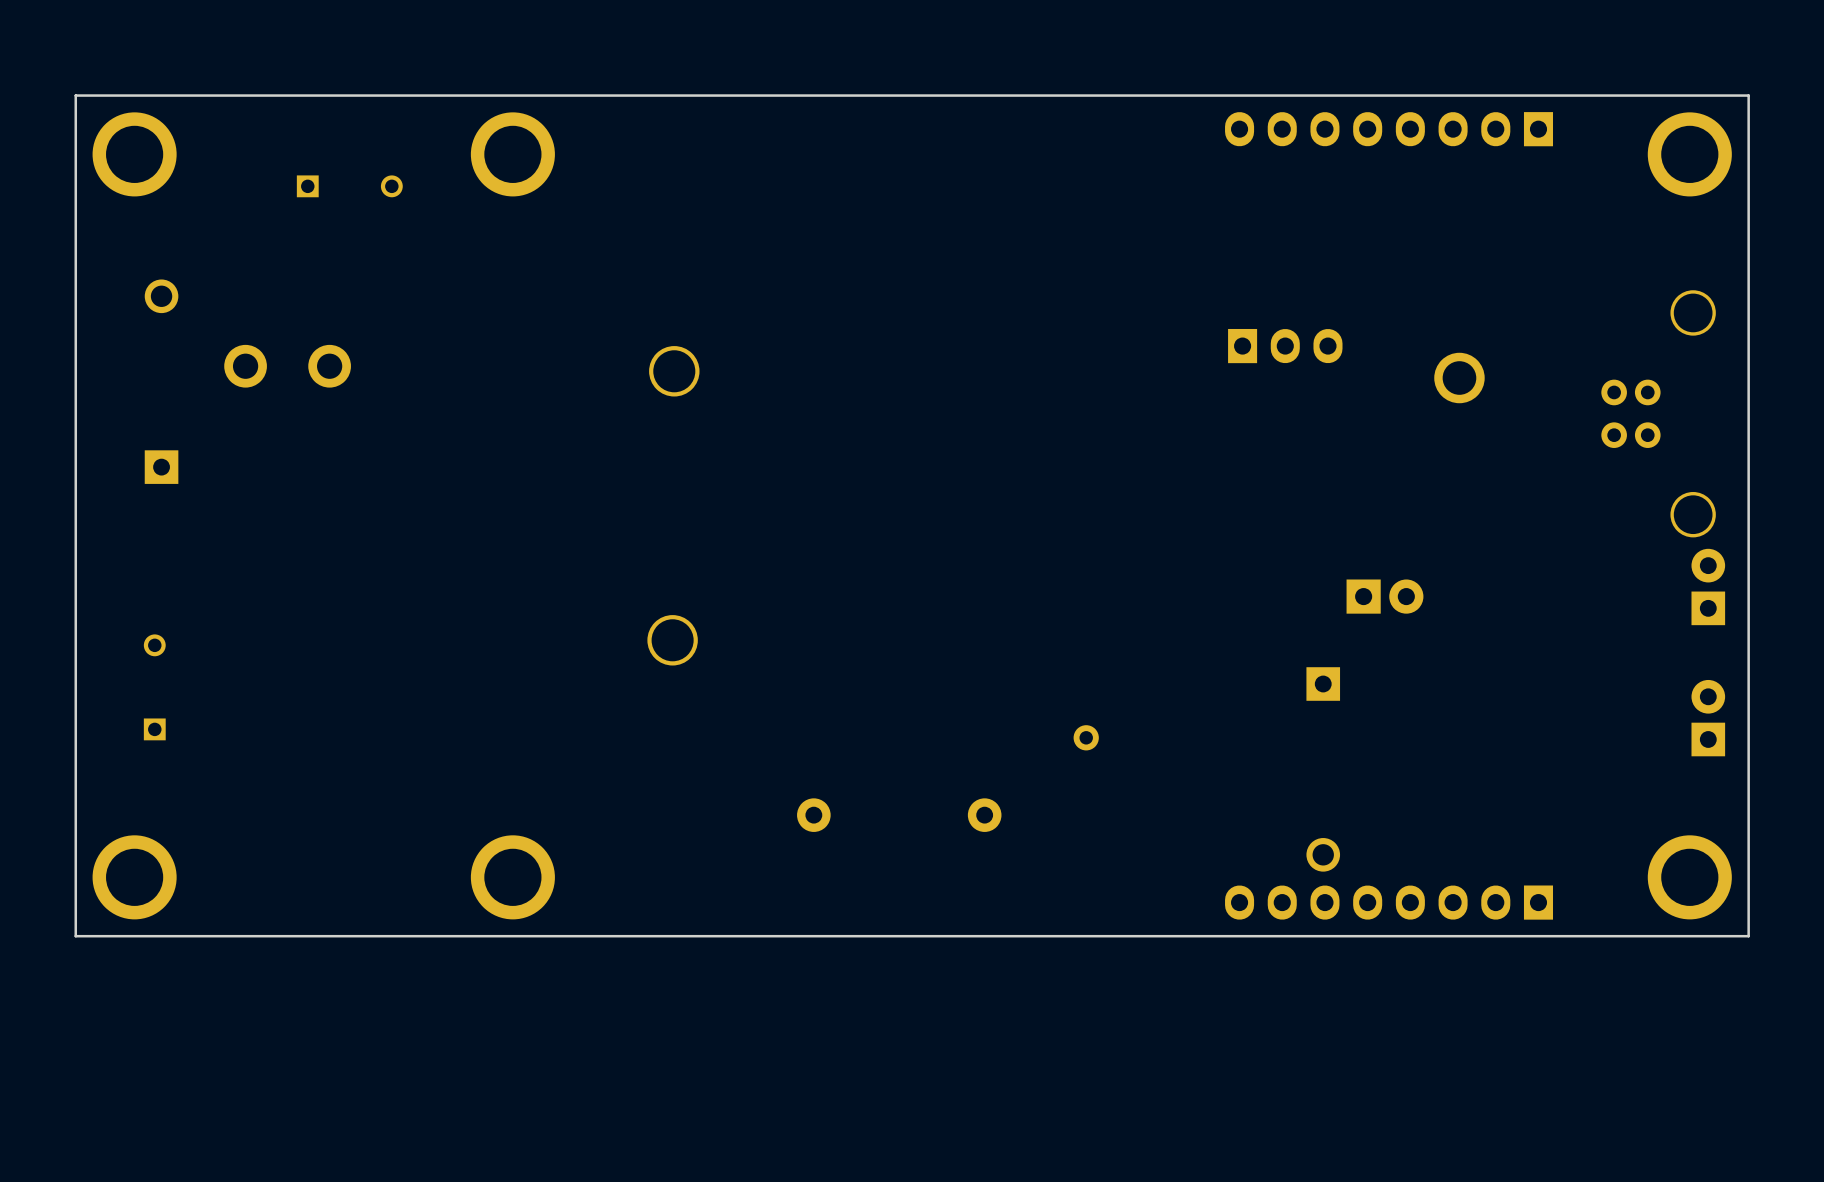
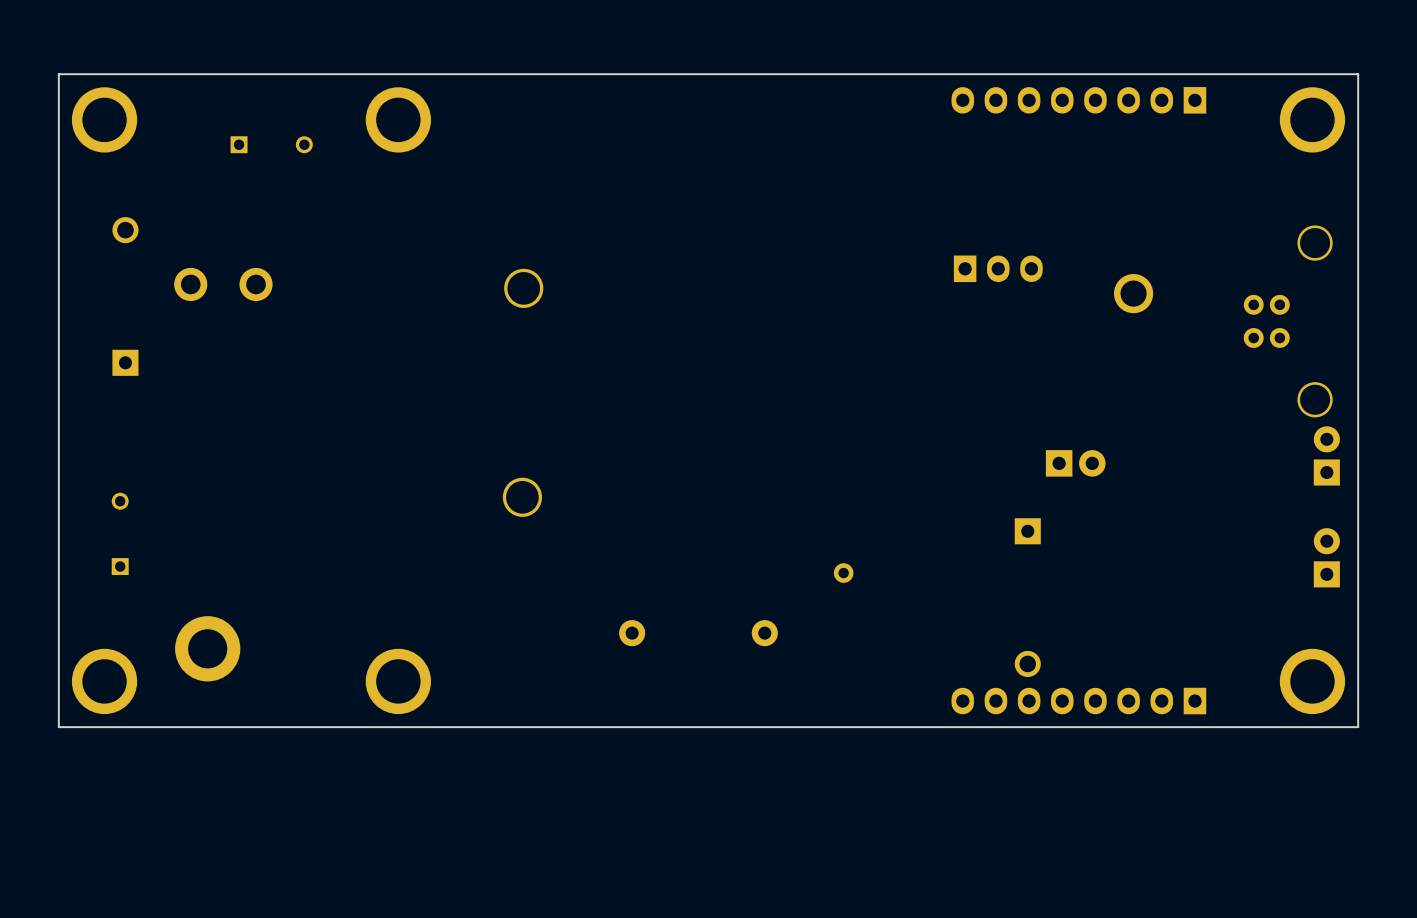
part: none -> (207, 648)

